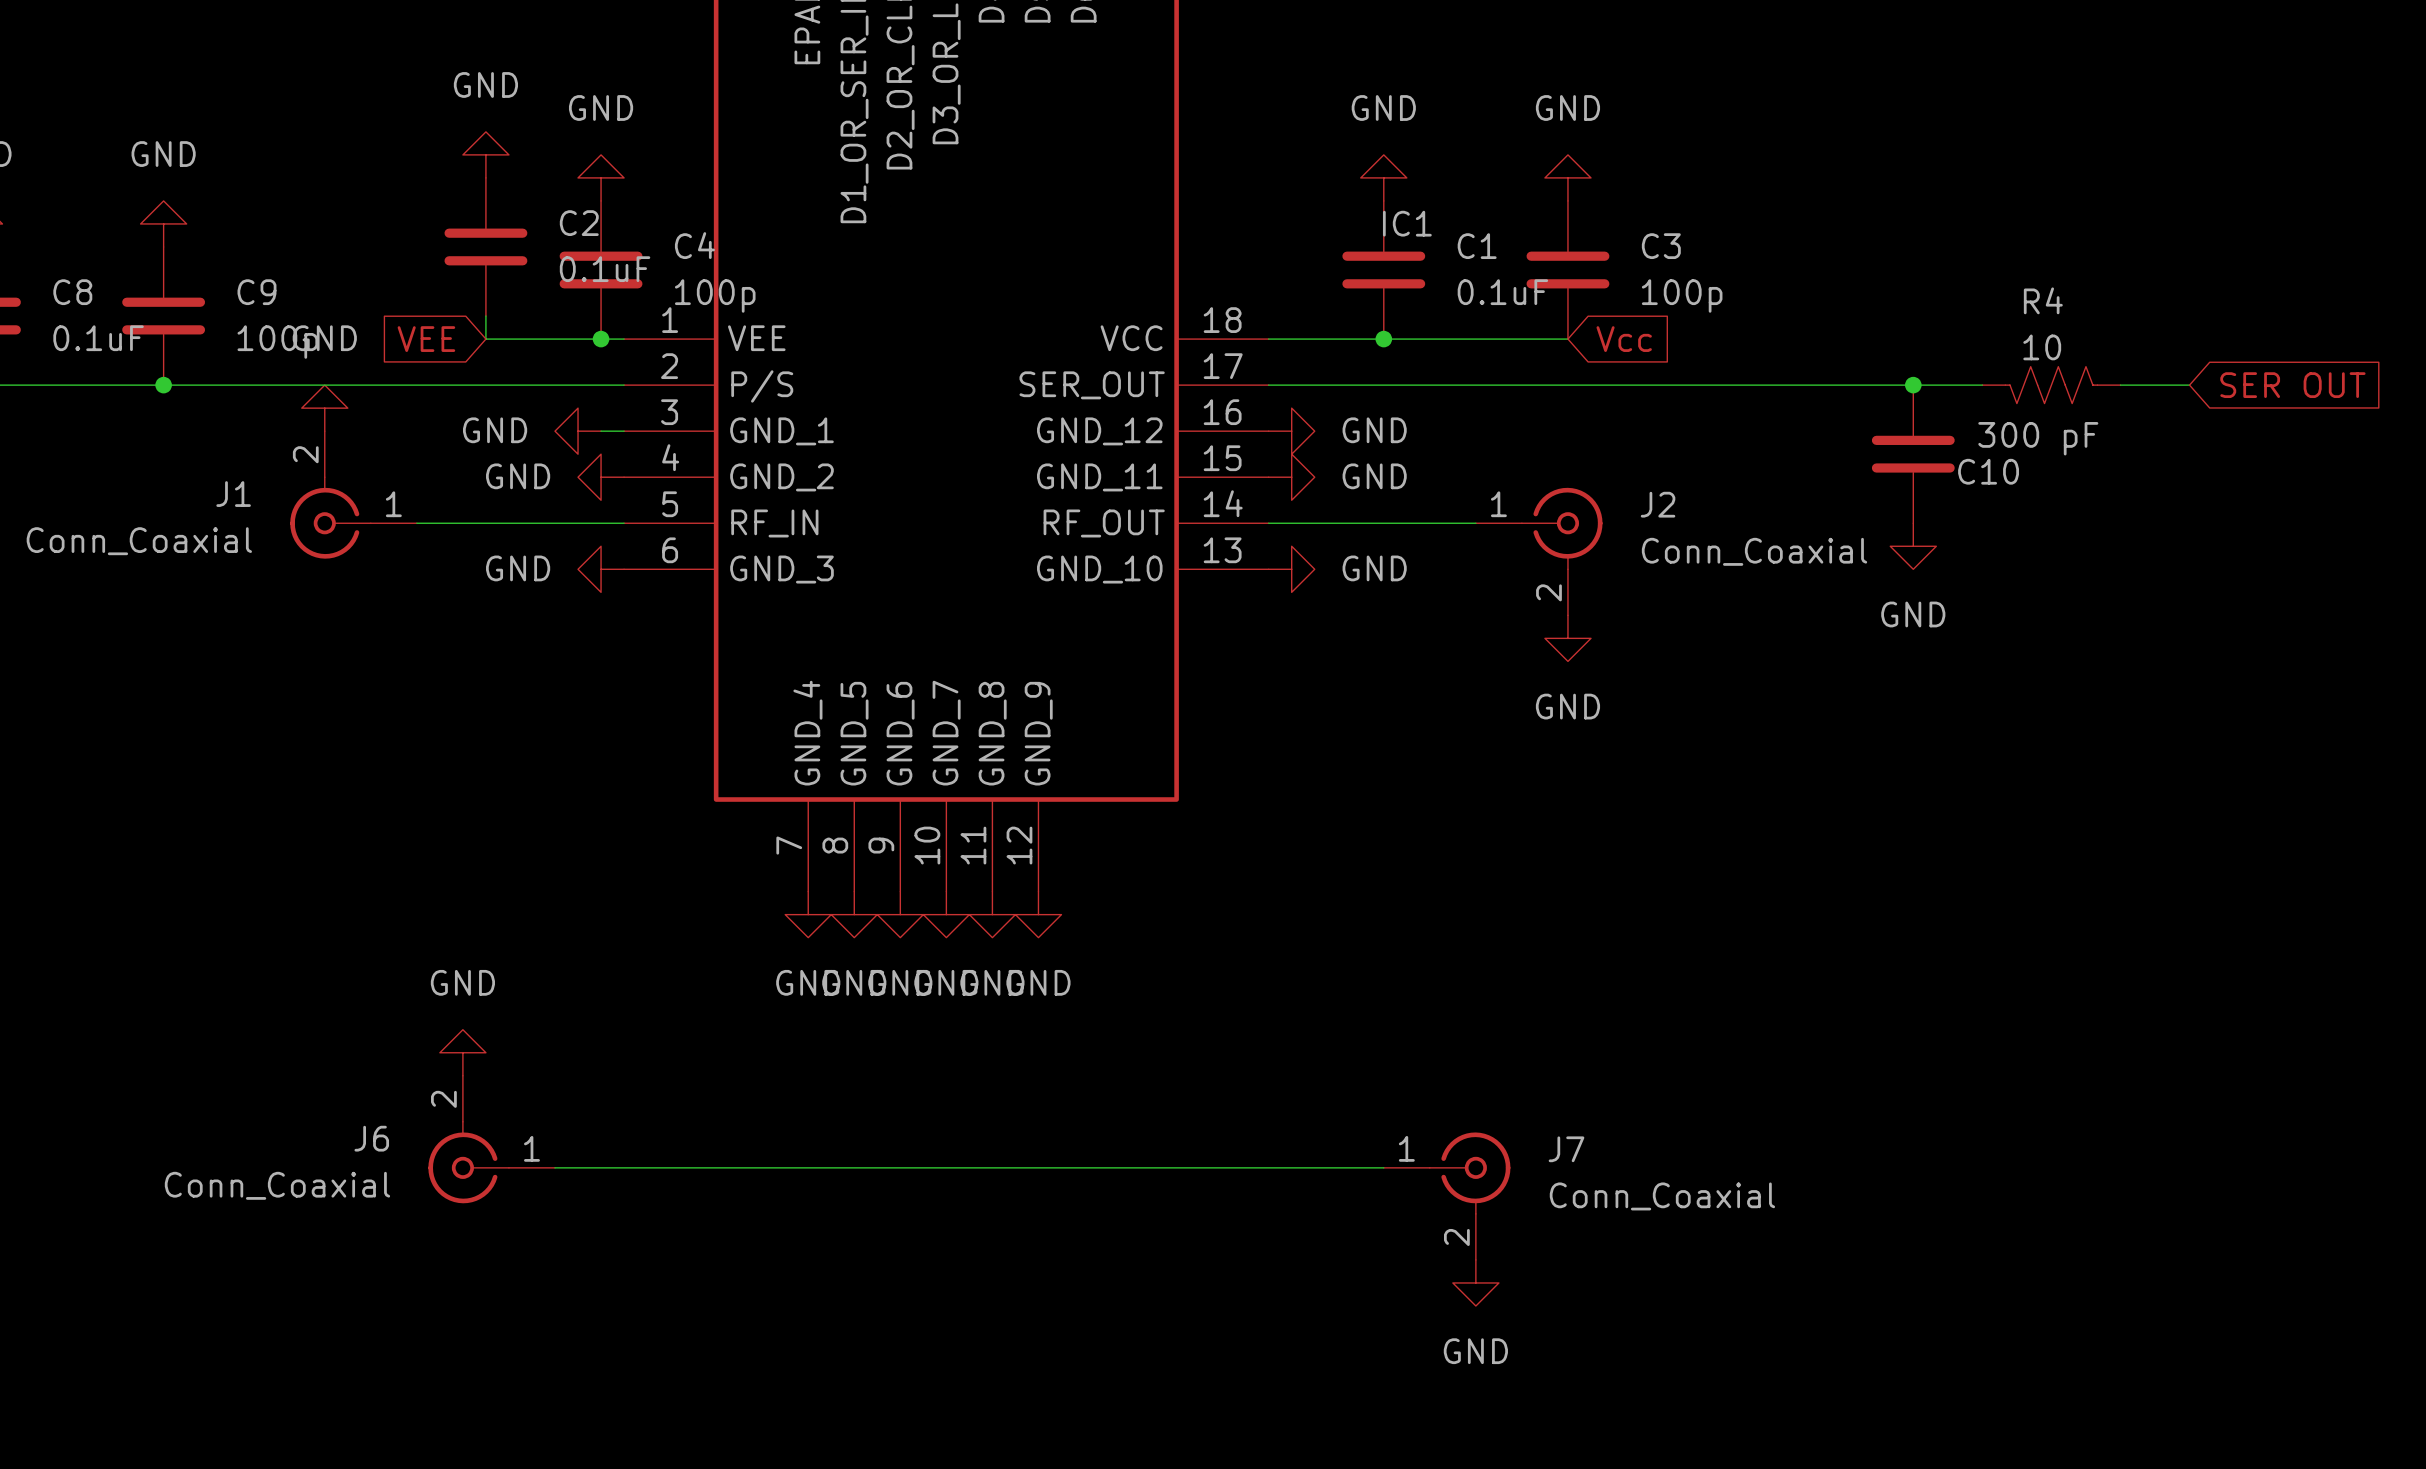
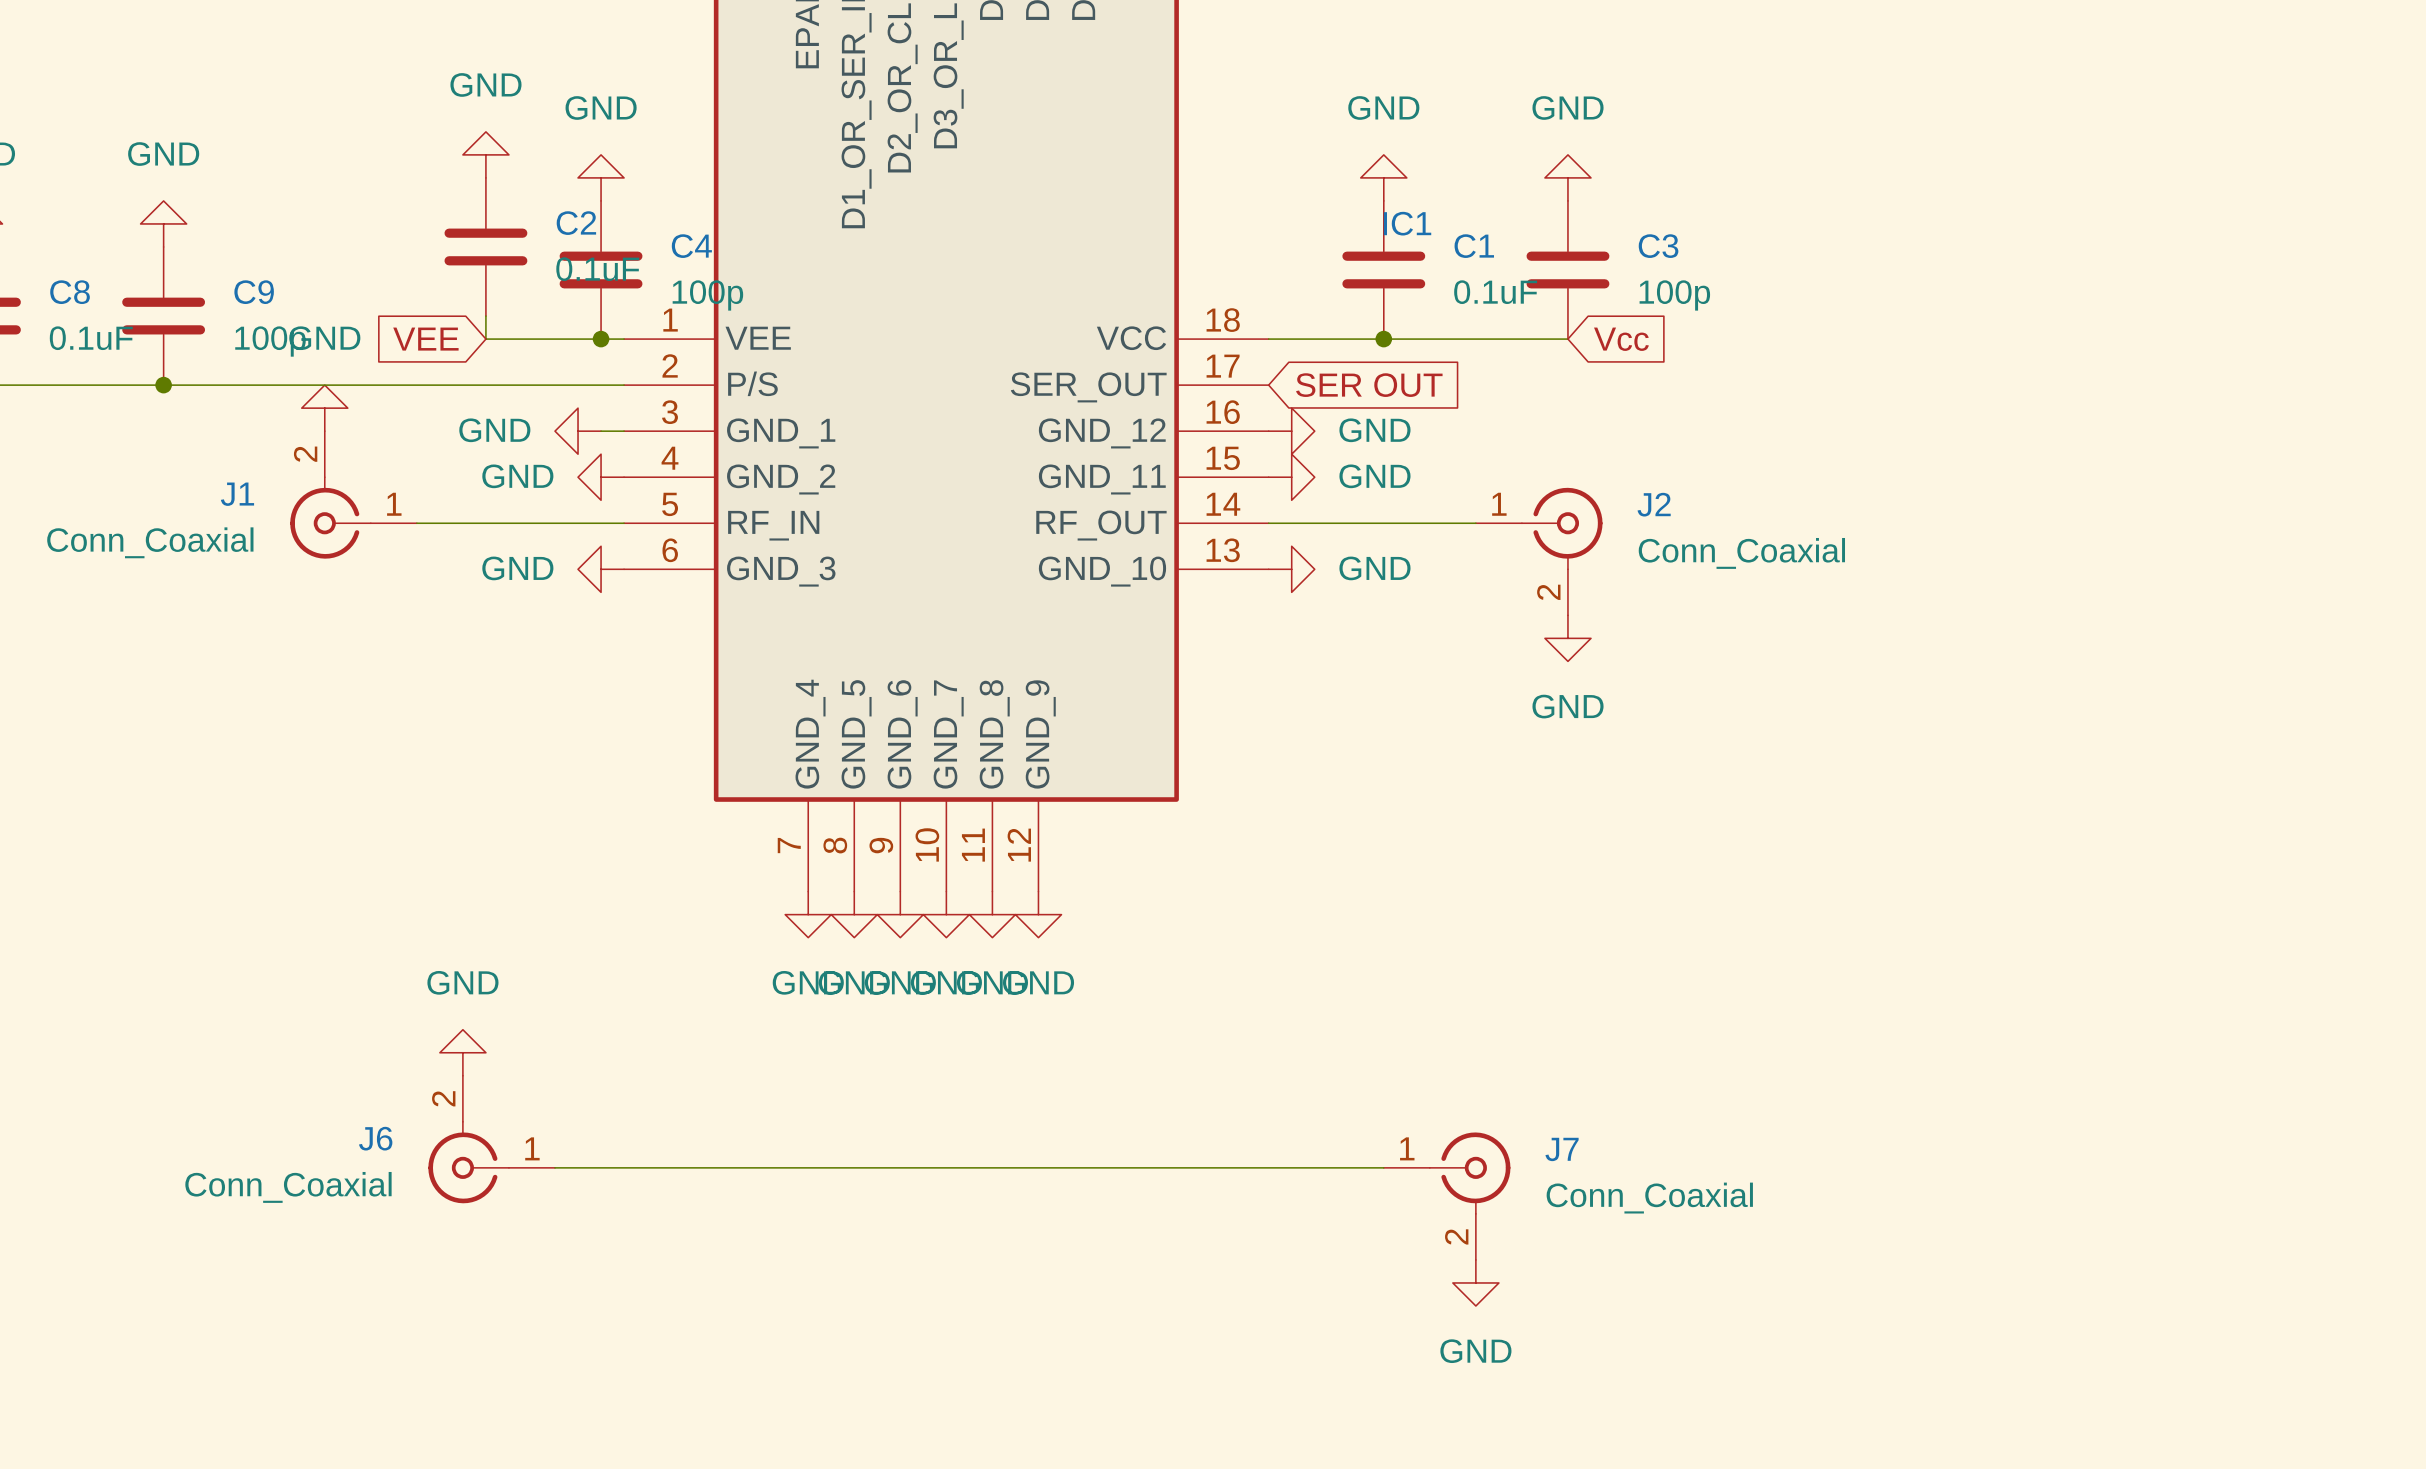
wire: (1268, 385) (1982, 385) -> none
global label: none -> SER OUT (1369, 385)
junction: (1913, 385) -> none
R4: 10 (2051, 385) -> none
wire: (2120, 385) (2189, 385) -> none
global label: SER OUT (2292, 385) -> none
C10: 300 pF (1913, 454) -> none
power symbol: GND (1913, 546) -> none

